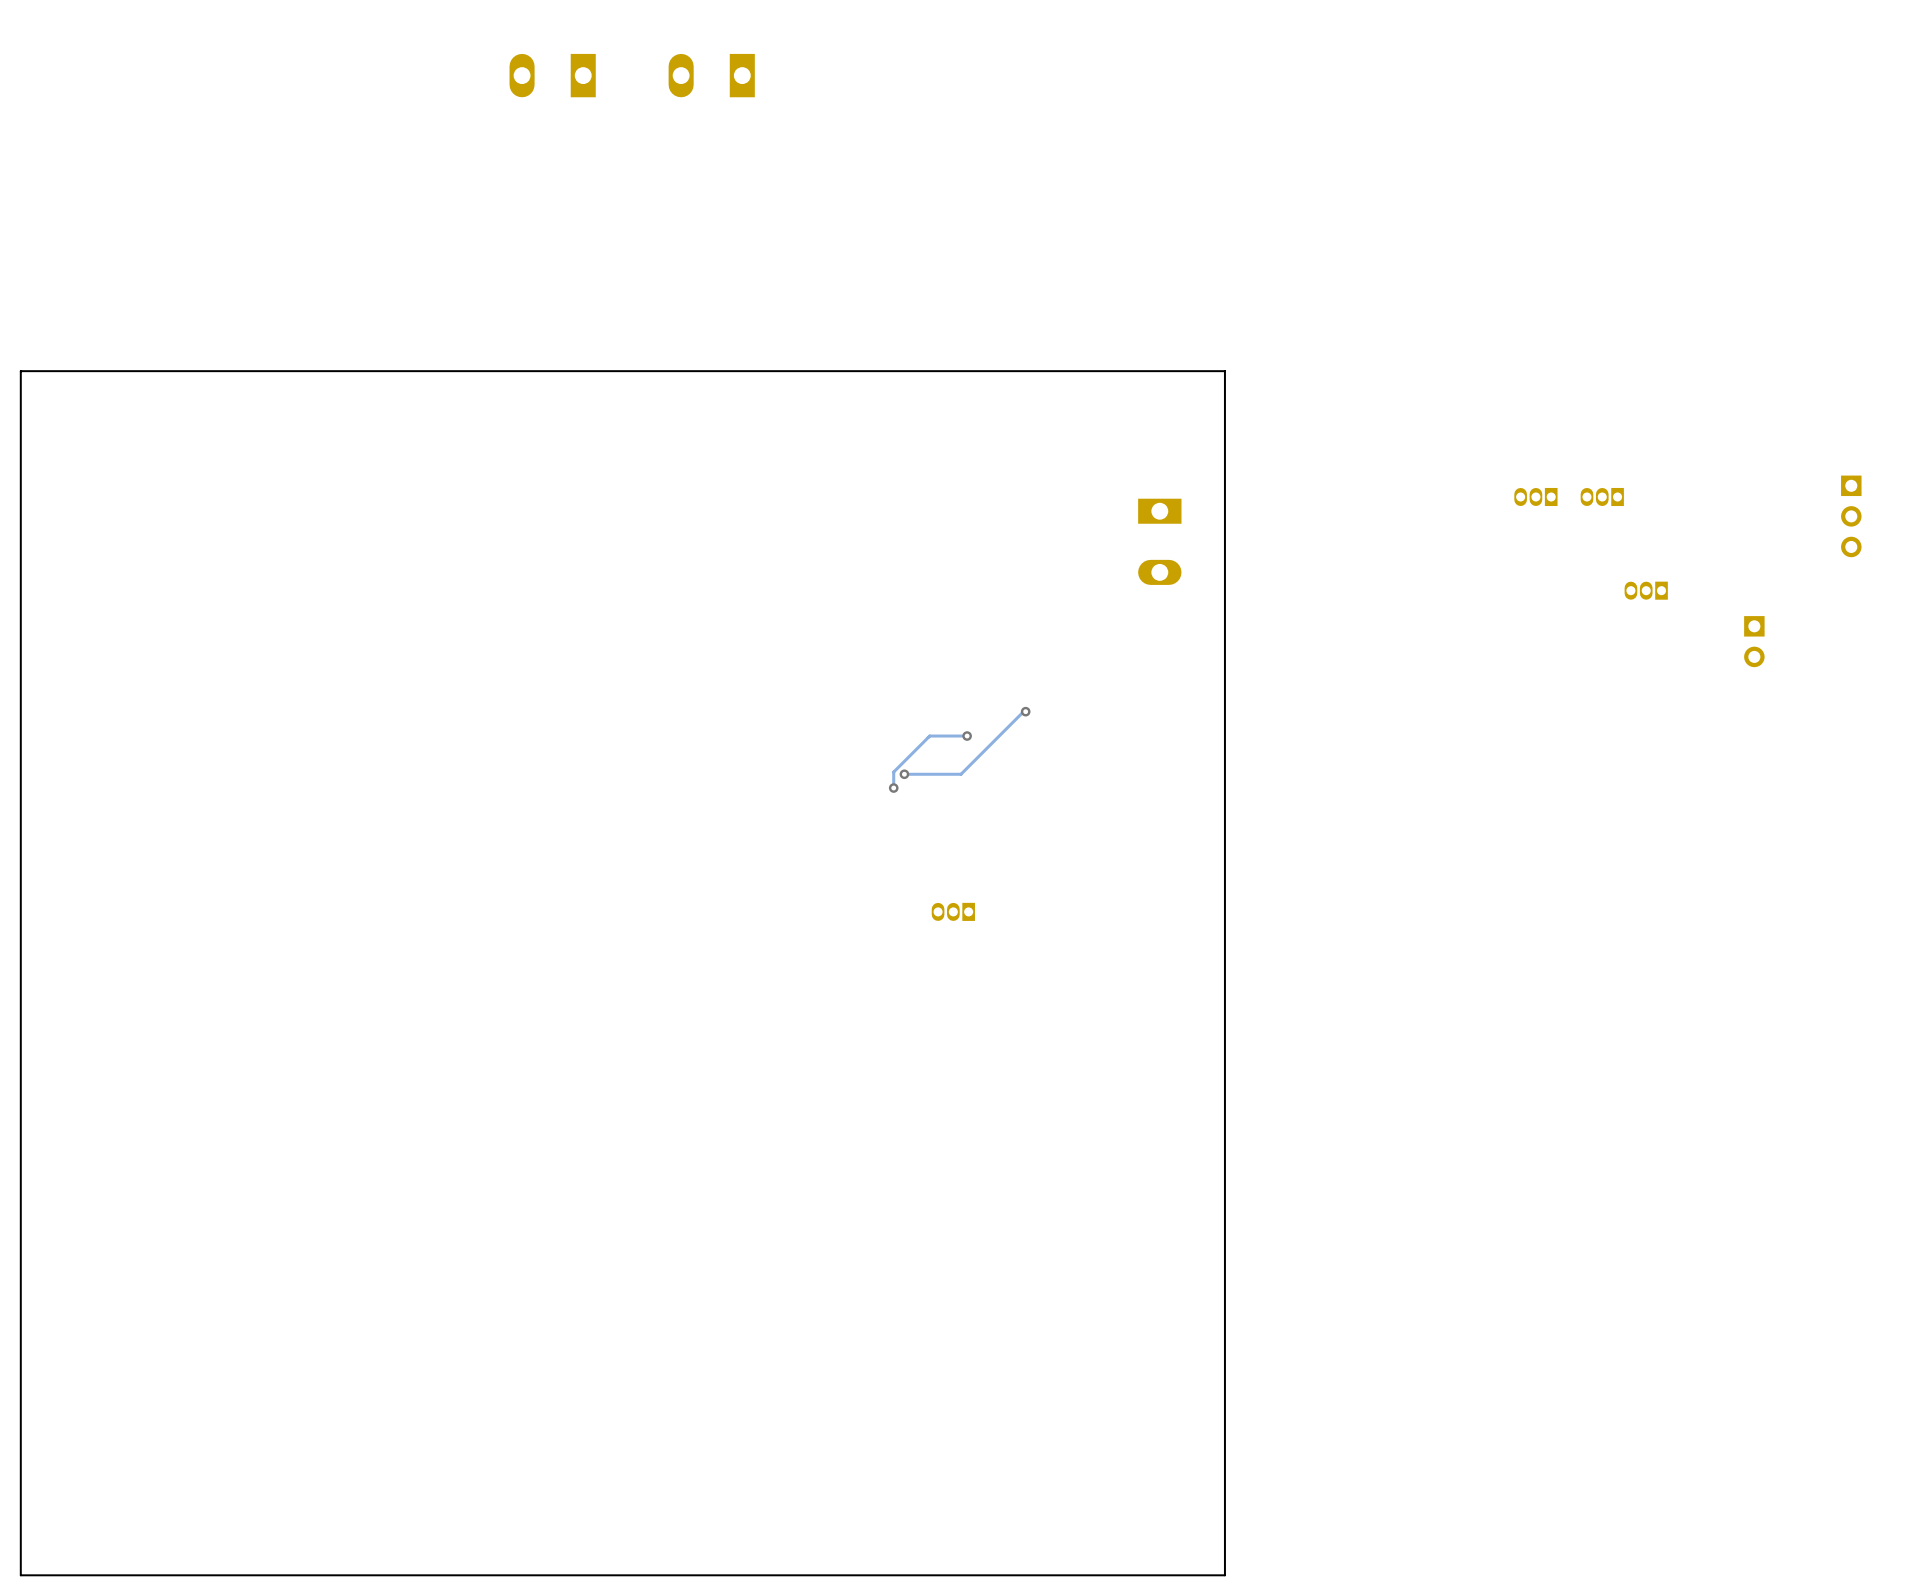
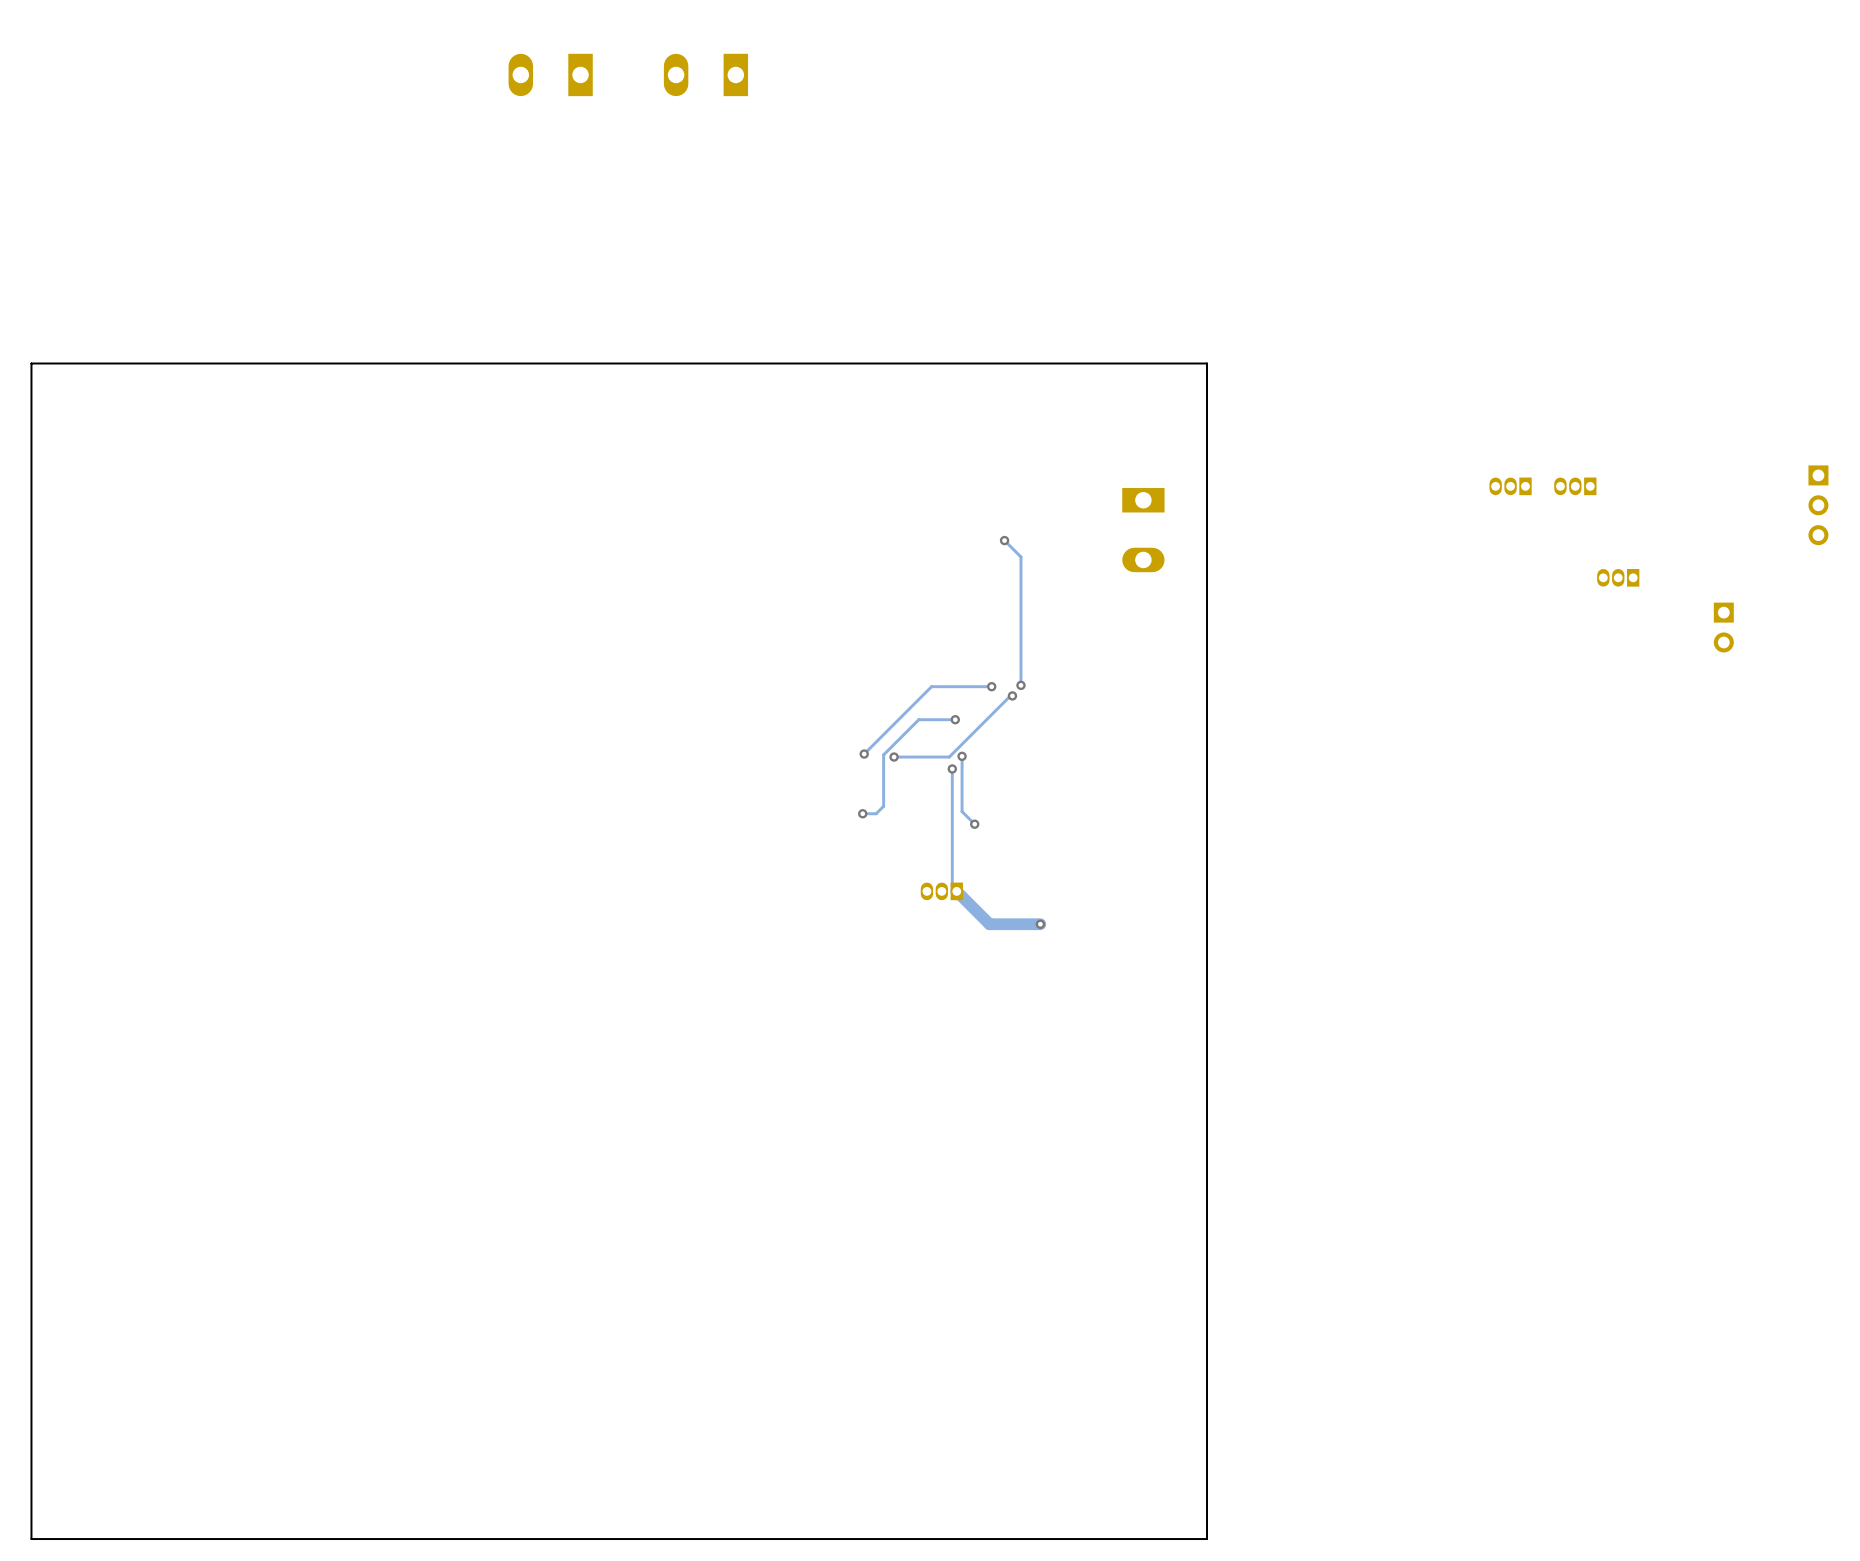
track: none -> (1004, 540) (1020, 556) (1020, 685)
via: none -> (1004, 540)
via: none -> (1020, 685)
track: none -> (991, 686) (931, 686) (864, 754)
via: none -> (991, 686)
via: none -> (864, 754)
track: none -> (962, 756) (962, 811) (974, 824)
via: none -> (962, 756)
track: none -> (952, 768) (952, 886) (958, 892) (956, 888)
via: none -> (952, 768)
track: none -> (883, 770) (883, 806) (876, 813) (862, 813)
via: (893, 788) -> none
via: none -> (862, 813)
via: none -> (974, 824)
track: none -> (956, 890) (989, 924) (1040, 924)
via: none -> (1040, 924)

